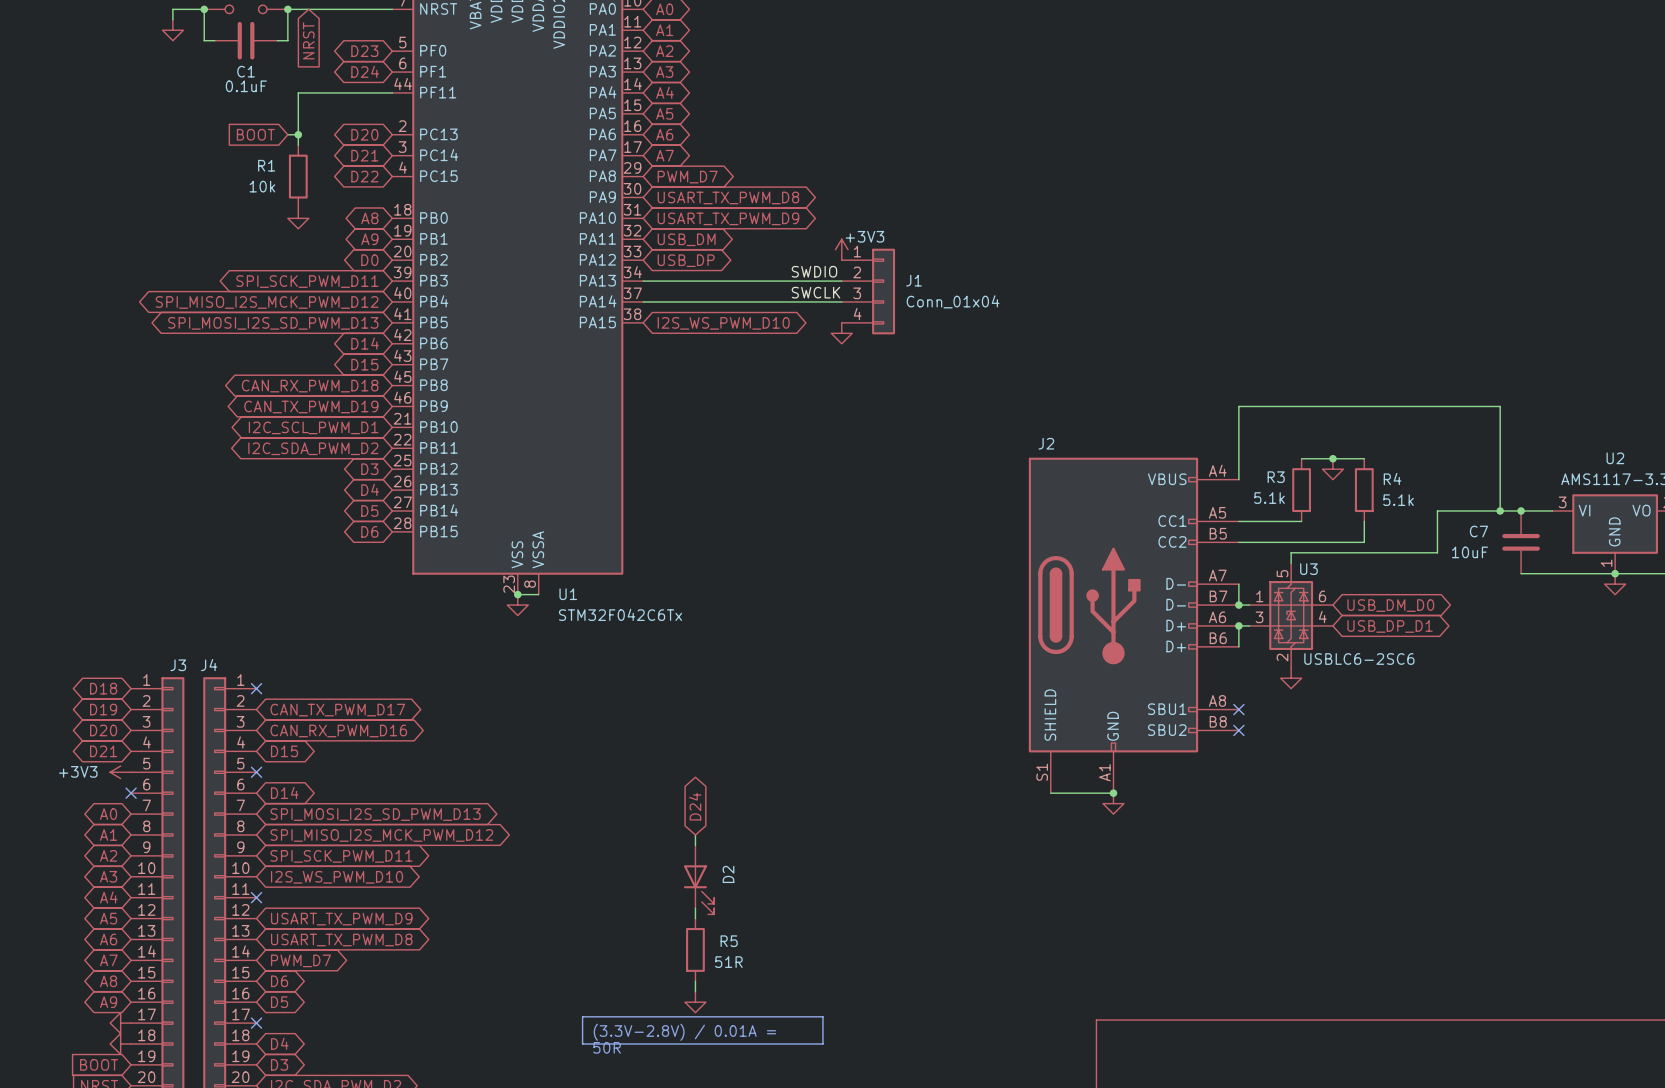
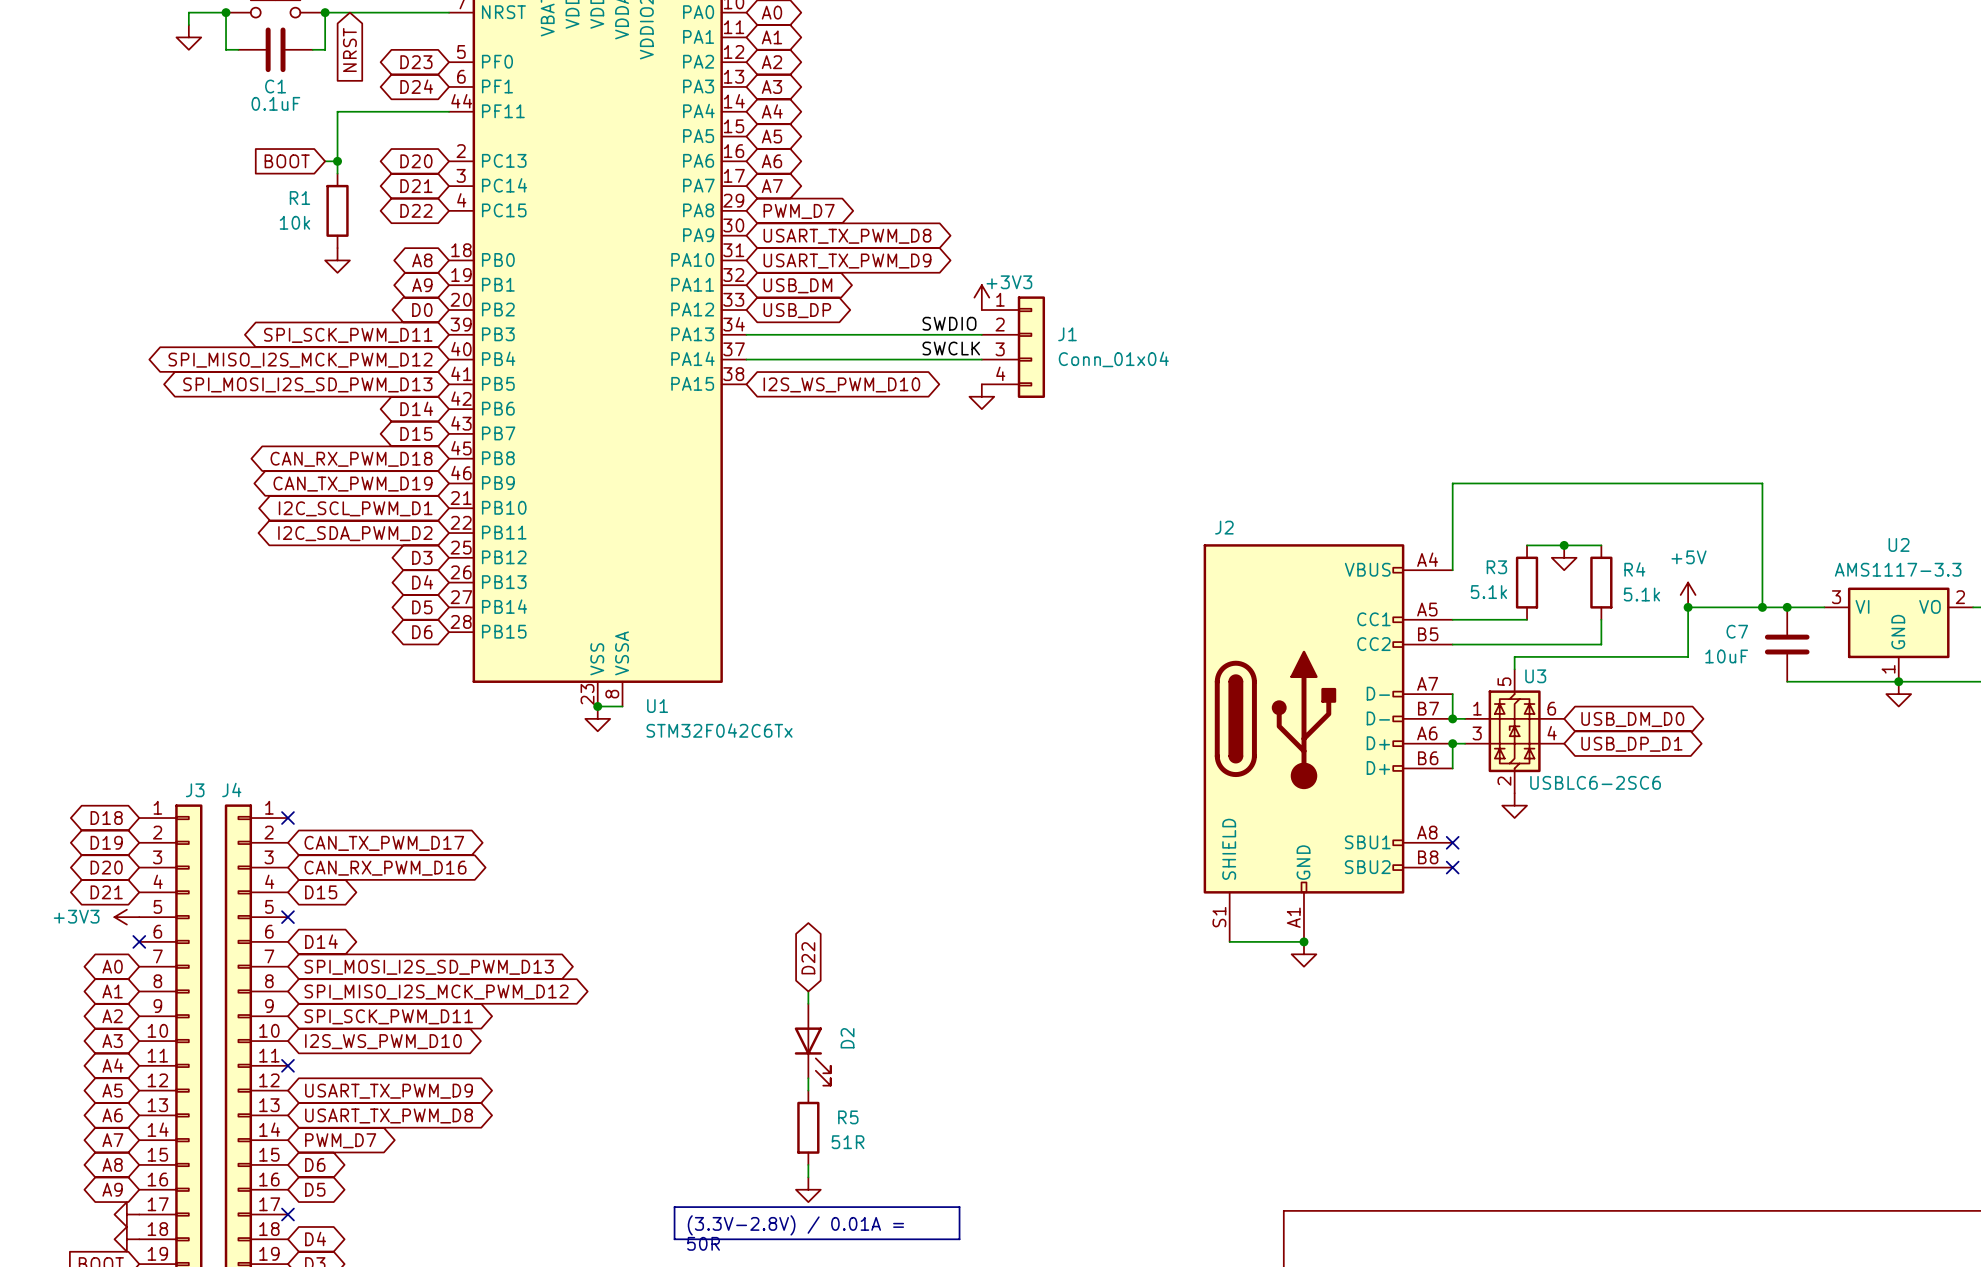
power symbol: none -> +5V (1688, 594)
junction: none -> (1688, 607)
global label: D24 (695, 806) -> D22 (808, 958)

